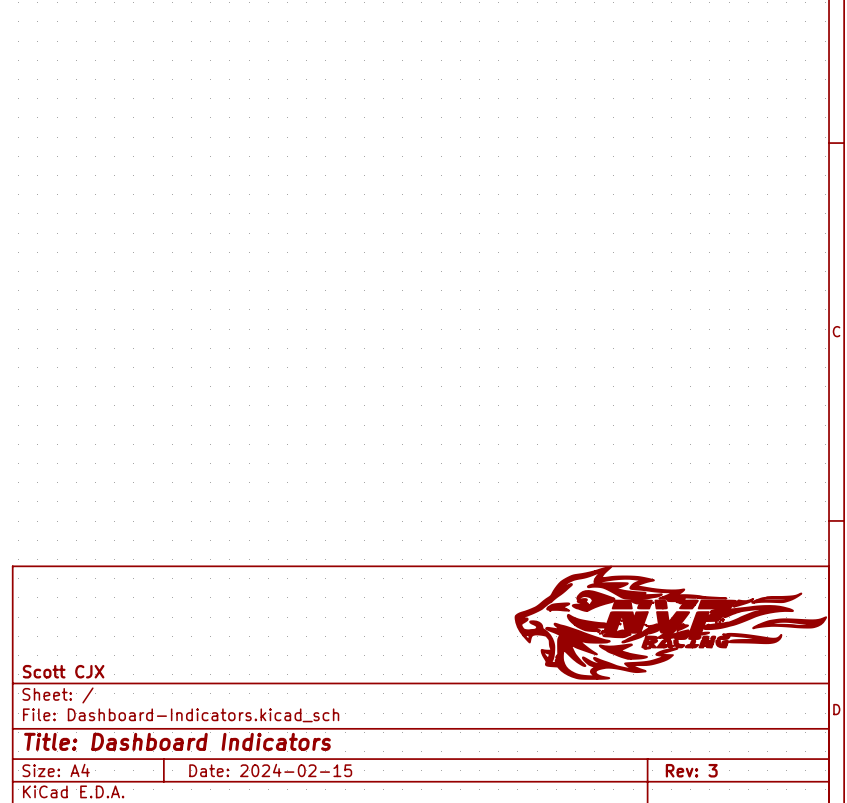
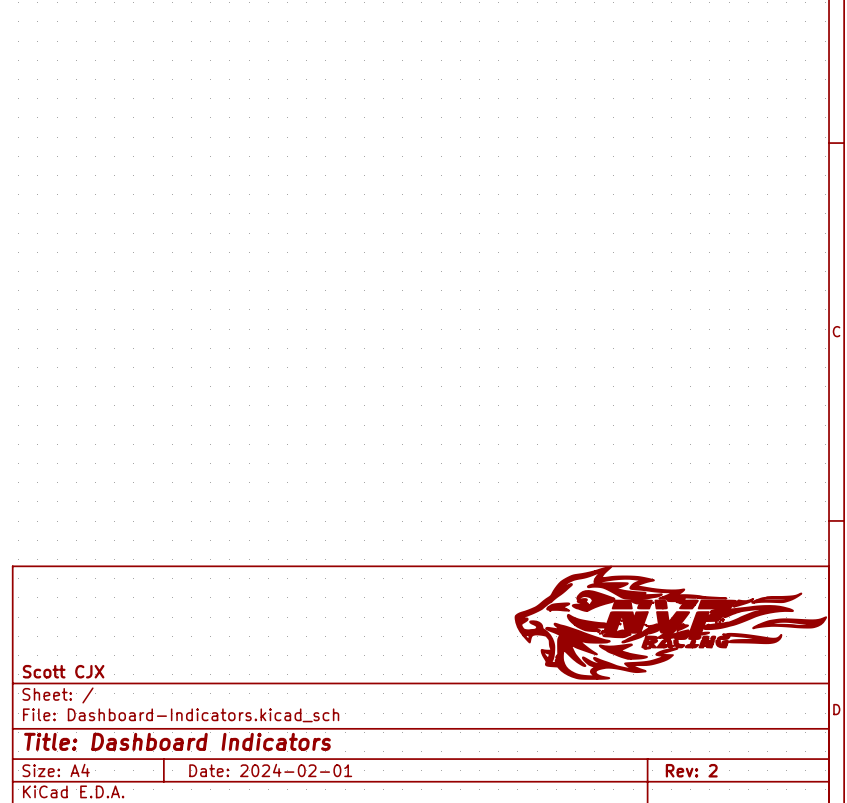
title block: Date: 2024-02-15 (270, 770) -> Date: 2024-02-01 (270, 770)
title block: Rev: 3 (691, 770) -> Rev: 2 (691, 770)

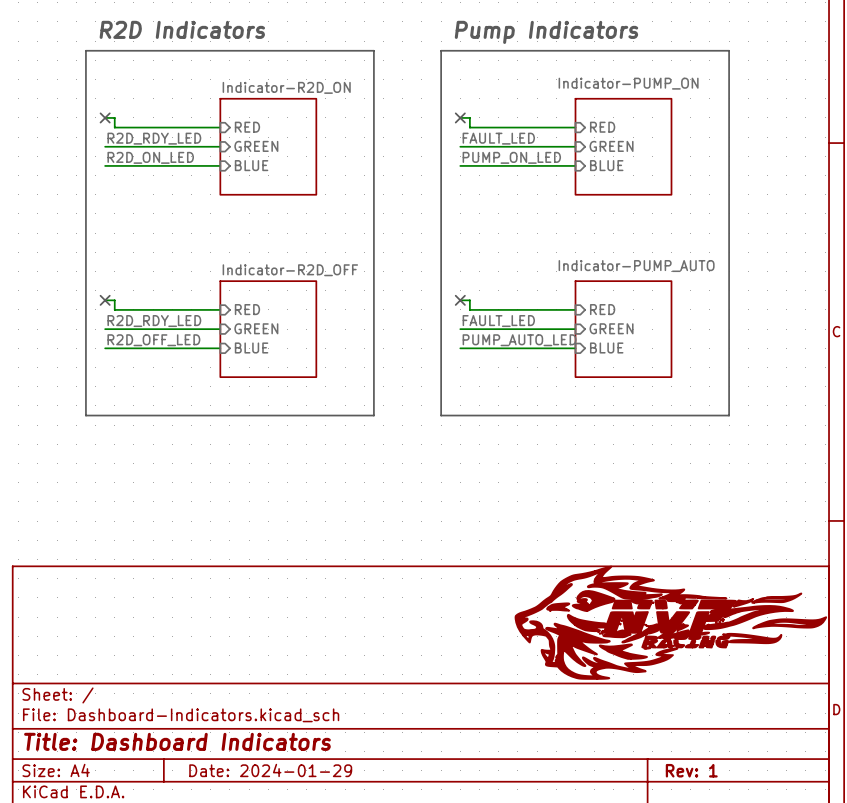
text: none -> R2D Indicators (182, 29)
text: none -> Pump Indicators (546, 32)
line: none -> (85, 50) (373, 50) (373, 415) (85, 415) (85, 50)
line: none -> (441, 50) (729, 50) (729, 415) (441, 415) (441, 50)
wire: none -> (105, 117) (114, 117) (114, 127) (220, 127)
no-connect mark: none -> (105, 117)
wire: none -> (460, 117) (469, 117) (469, 127) (575, 127)
no-connect mark: none -> (460, 117)
sheet pin: none -> RED (247, 127)
sheet pin: none -> RED (602, 127)
label: none -> R2D_RDY_LED (154, 138)
label: none -> FAULT_LED (498, 138)
wire: none -> (105, 146) (220, 146)
sheet pin: none -> GREEN (256, 146)
sheet Indicator-R2D_ON: none -> (268, 146)
wire: none -> (460, 146) (575, 146)
sheet pin: none -> GREEN (611, 146)
sheet Indicator-PUMP_ON: none -> (623, 146)
label: none -> R2D_ON_LED (150, 157)
label: none -> PUMP_ON_LED (511, 157)
wire: none -> (105, 165) (220, 165)
sheet pin: none -> BLUE (251, 165)
wire: none -> (460, 165) (575, 165)
sheet pin: none -> BLUE (606, 165)
wire: none -> (105, 300) (114, 300) (114, 309) (220, 309)
no-connect mark: none -> (105, 300)
wire: none -> (460, 300) (469, 300) (469, 309) (575, 309)
no-connect mark: none -> (460, 300)
sheet pin: none -> RED (247, 309)
sheet pin: none -> RED (602, 309)
label: none -> R2D_RDY_LED (154, 321)
label: none -> FAULT_LED (498, 321)
sheet pin: none -> GREEN (256, 328)
sheet pin: none -> GREEN (611, 328)
wire: none -> (105, 329) (220, 329)
sheet Indicator-R2D_OFF: none -> (268, 329)
wire: none -> (460, 329) (575, 329)
sheet Indicator-PUMP_AUTO: none -> (623, 329)
label: none -> R2D_OFF_LED (153, 340)
label: none -> PUMP_AUTO_LED (519, 340)
sheet pin: none -> BLUE (251, 347)
sheet pin: none -> BLUE (606, 347)
wire: none -> (105, 348) (220, 348)
wire: none -> (460, 348) (575, 348)
title block: Scott CJX (63, 671) -> none
title block: Date: 2024-02-01 (270, 770) -> Date: 2024-01-29 (270, 770)
title block: Rev: 2 (691, 770) -> Rev: 1 (691, 770)

